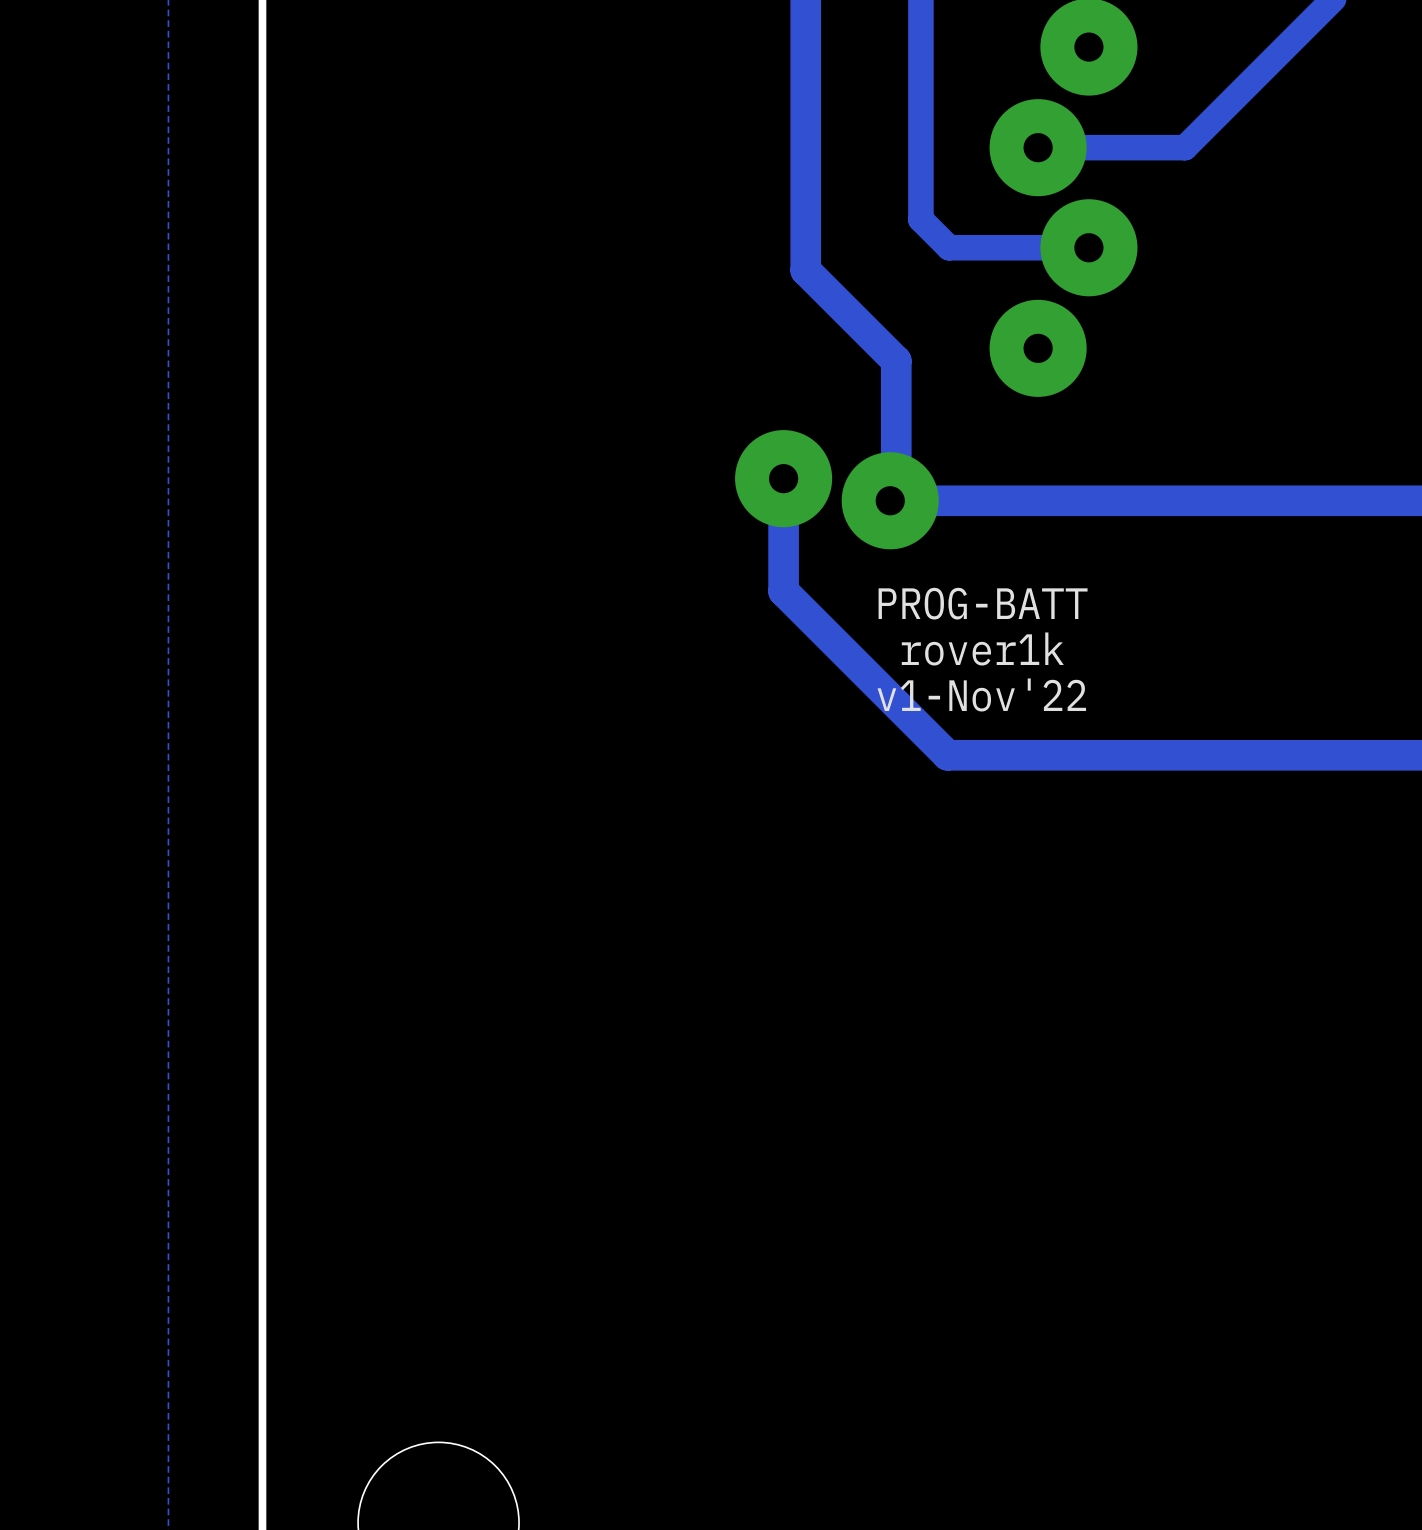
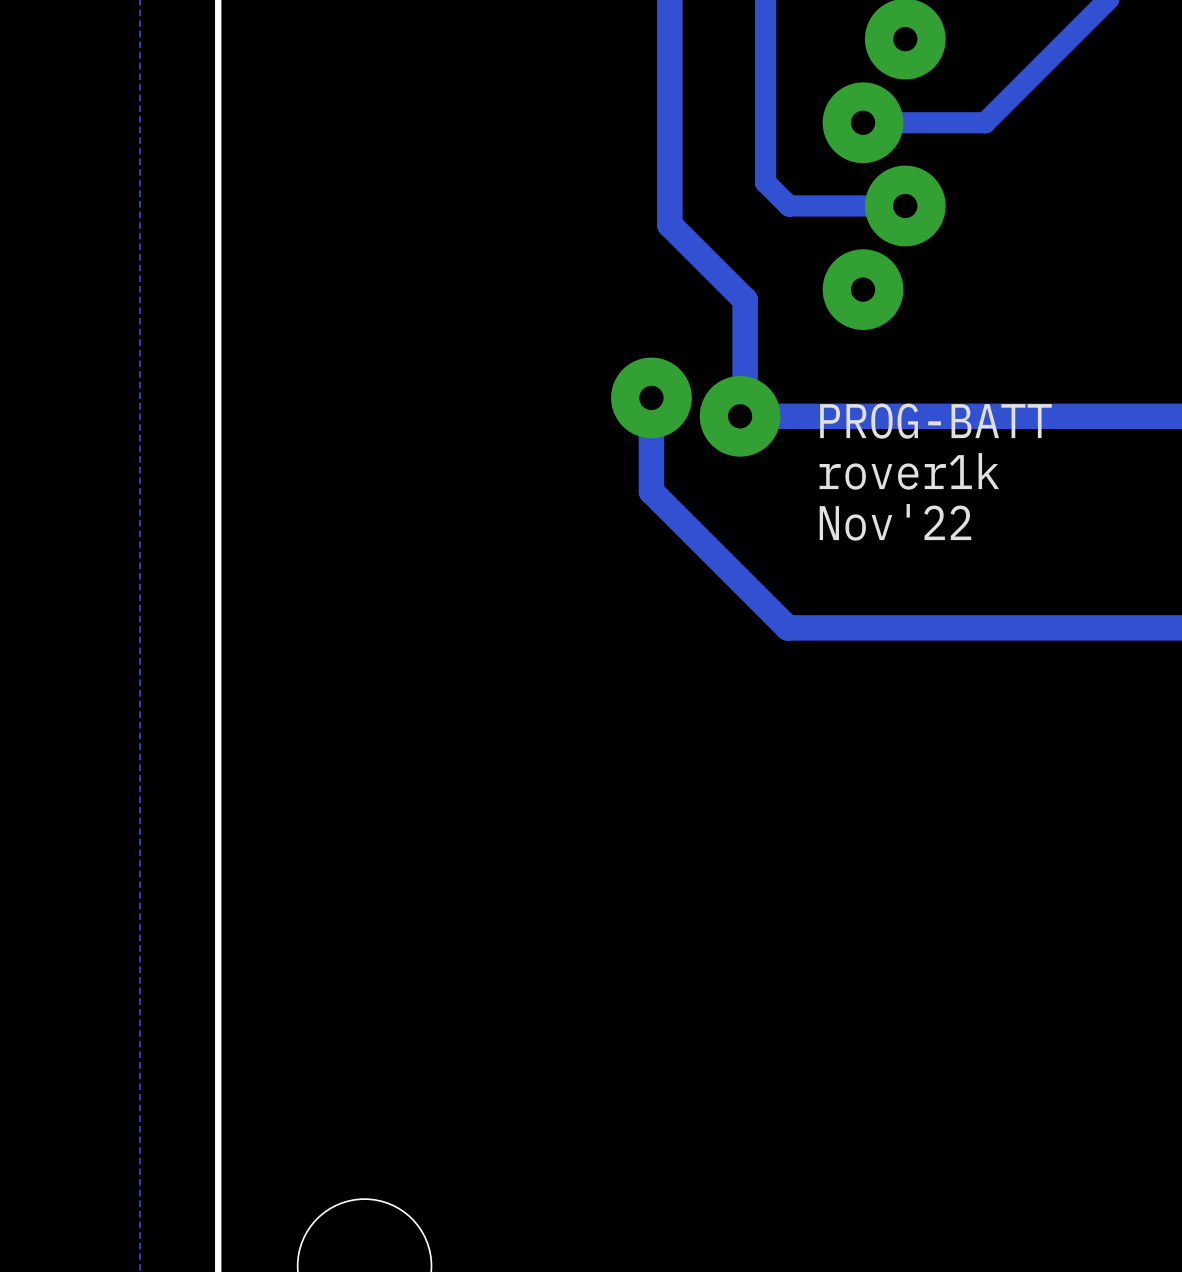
text: none -> PROG-BATT (935, 421)
text: PROG-BATT (983, 603) -> rover1k (909, 471)
text: rover1k (982, 649) -> Nov'22 (895, 522)
text: v1-Nov'22 (981, 694) -> none

